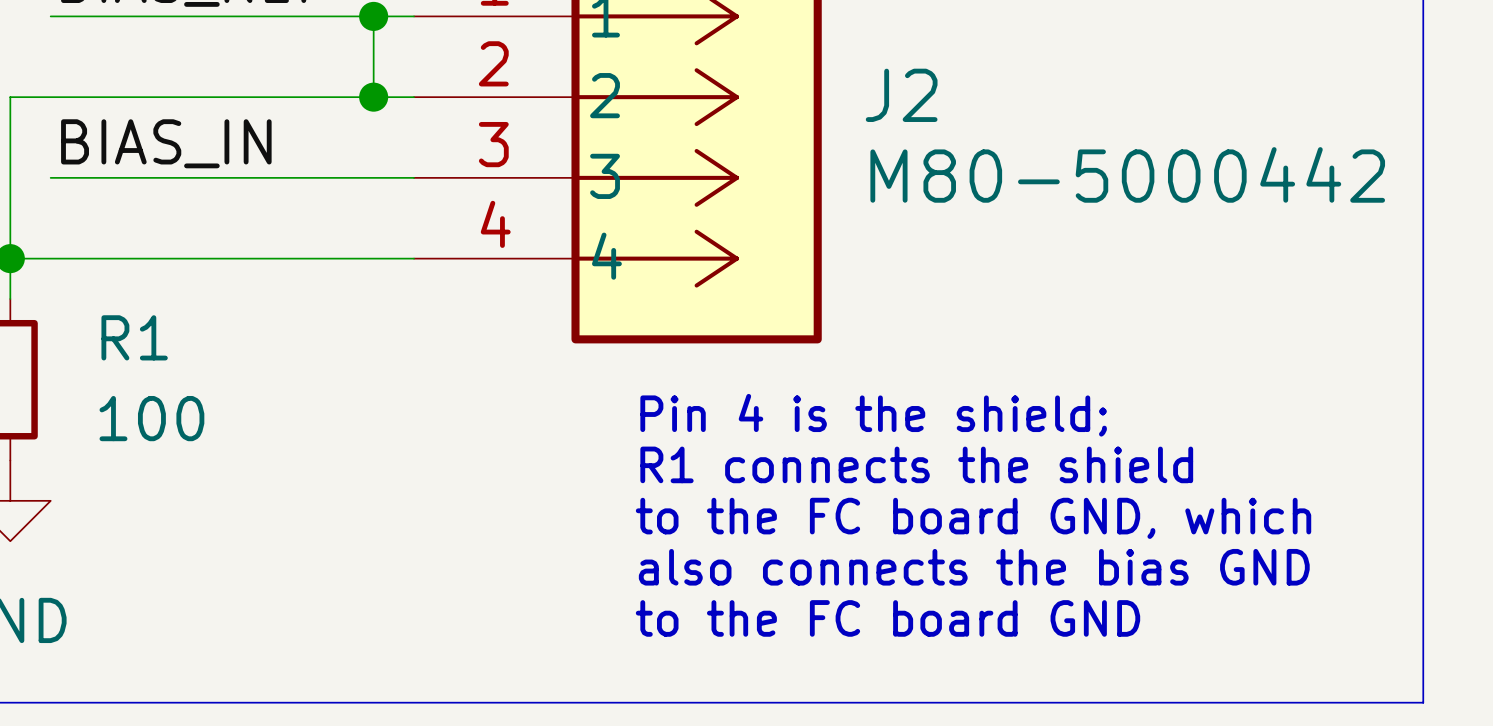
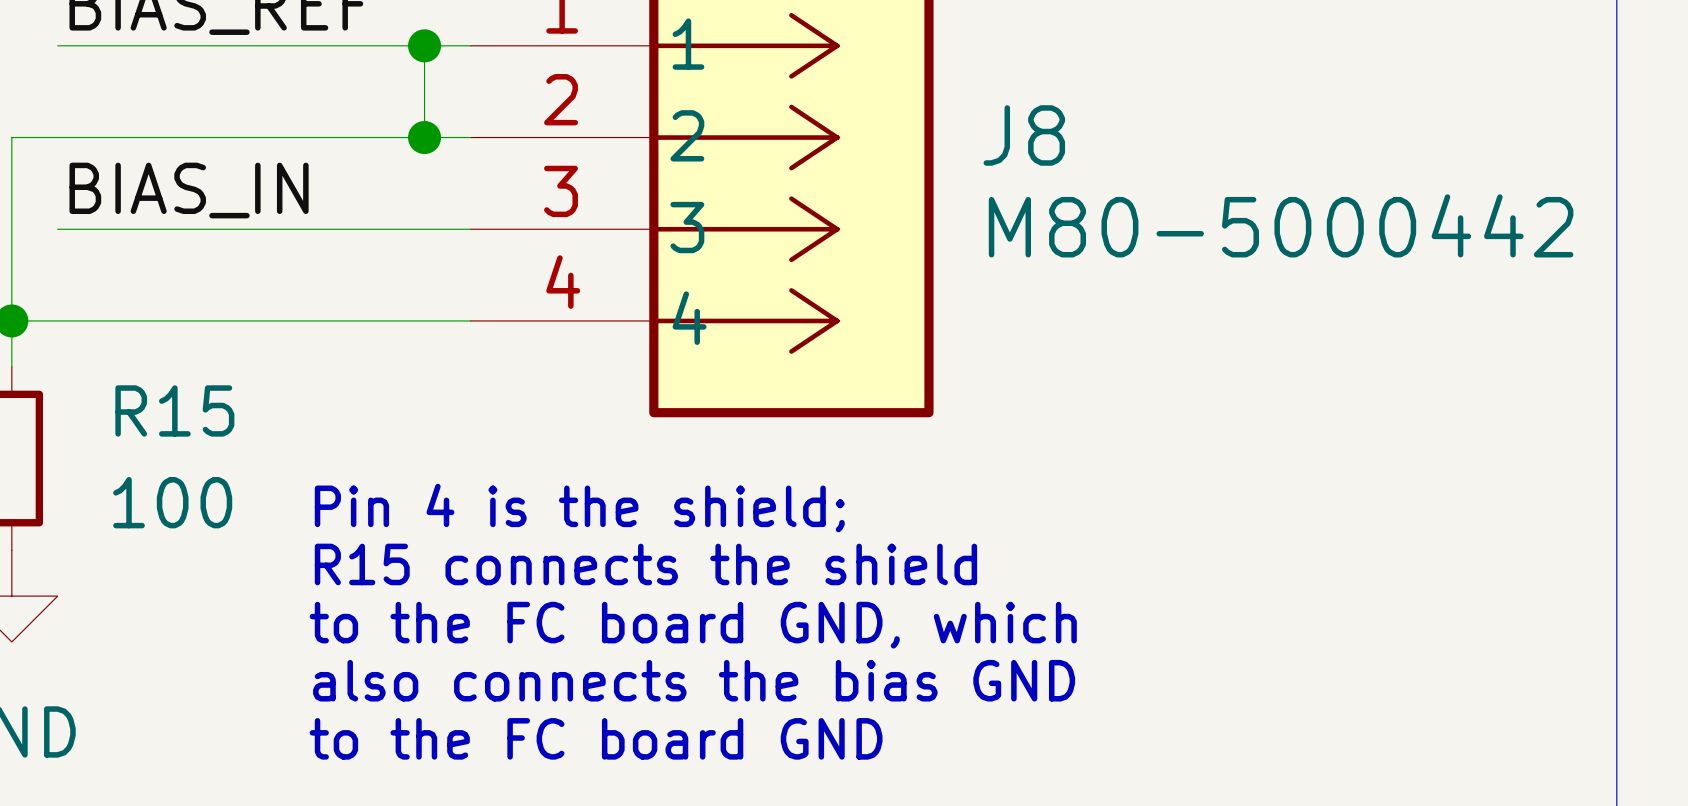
J2 name: J2 (901, 95) -> J8 (1024, 135)
R1 name: R1 (134, 337) -> R15 (174, 410)
text position: Pin 4 is the shield; (873, 415) -> Pin 4 is the shield; (579, 508)
text: R1 connects the shield (916, 464) -> R15 connects the shield (645, 564)
text position: to the FC board GND, which (973, 518) -> to the FC board GND, which (693, 625)
text position: also connects the bias GND (974, 567) -> also connects the bias GND (694, 680)
text position: to the FC board GND (887, 618) -> to the FC board GND (596, 738)

